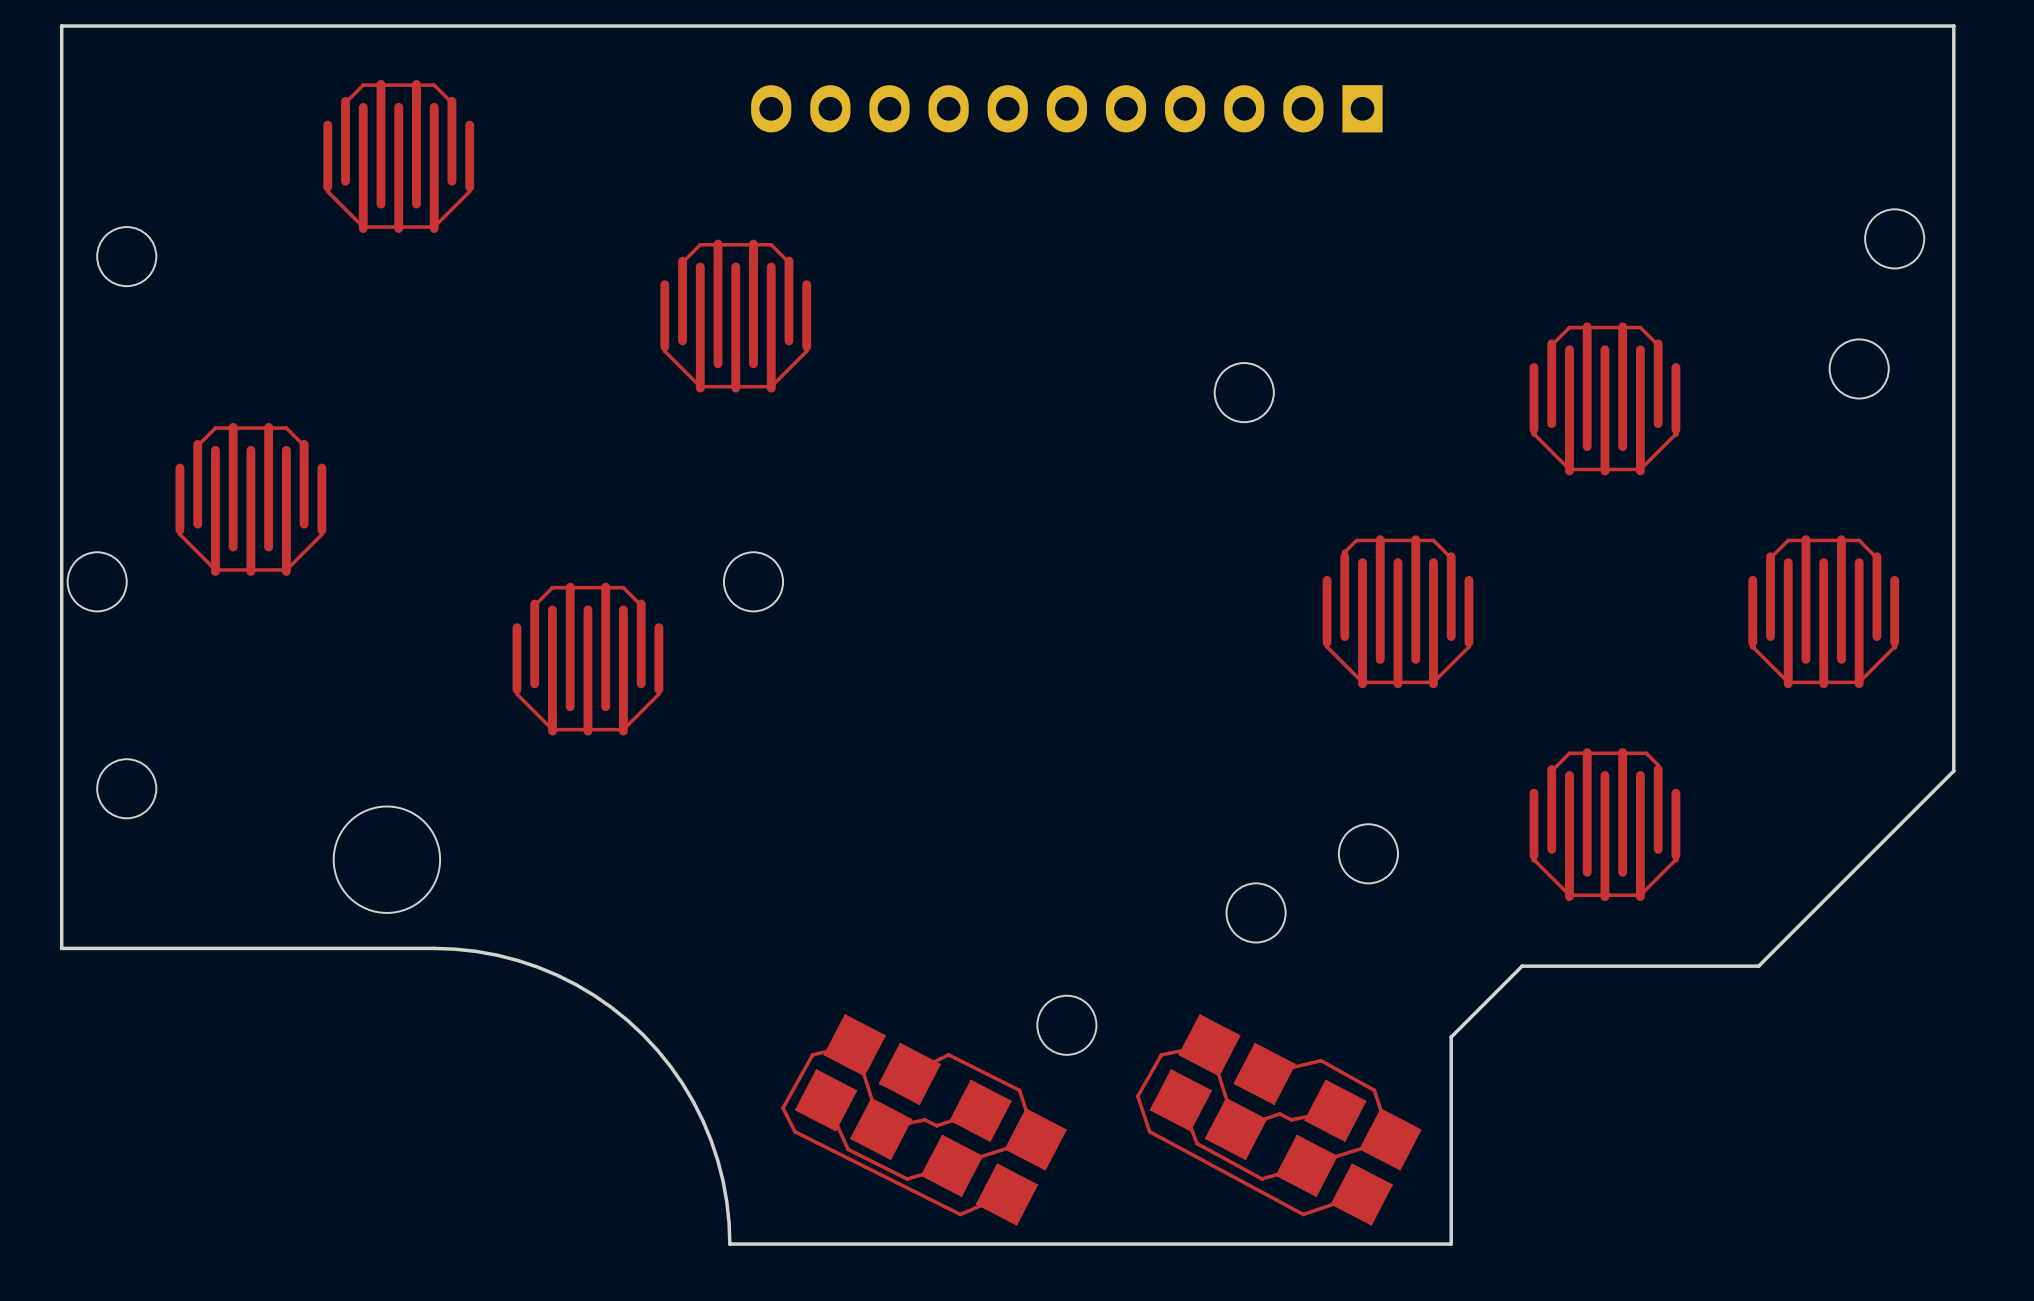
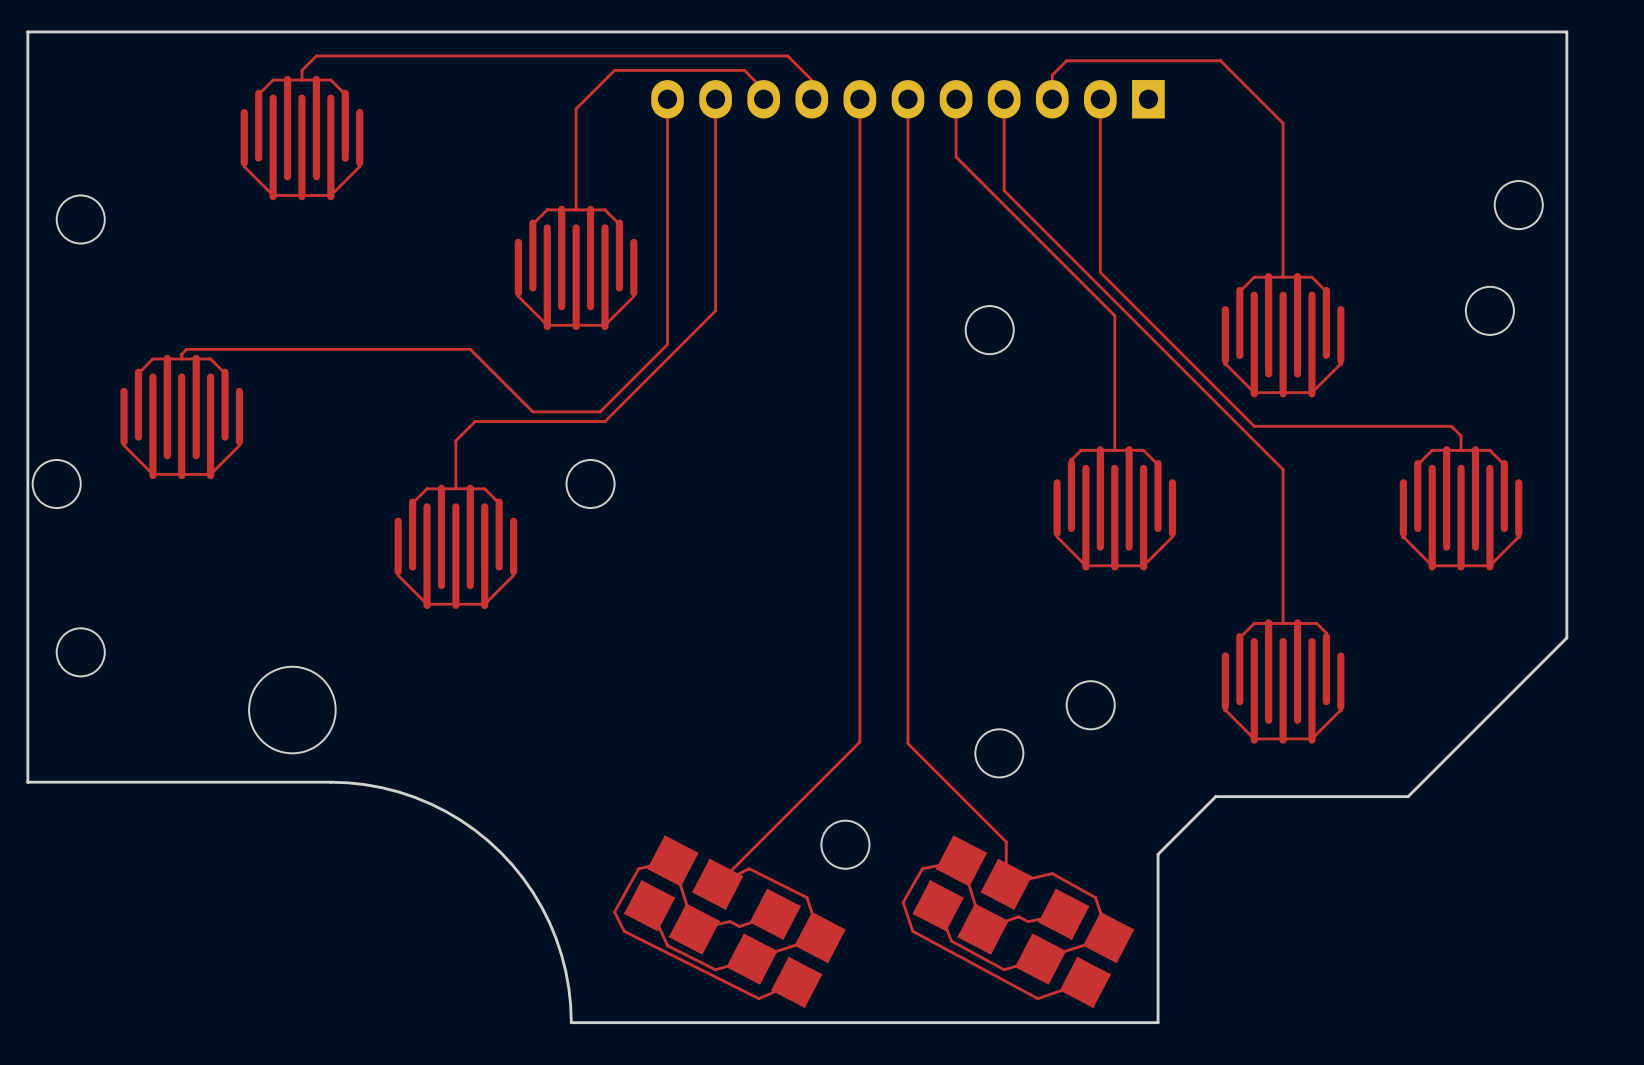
top track: none -> (301, 80) (301, 70) (316, 55) (787, 55) (811, 80) (811, 99)
top track: none -> (667, 99) (667, 344) (600, 411) (532, 411) (470, 349) (186, 349) (181, 354) (181, 358)
top track: none -> (715, 99) (715, 310) (604, 421) (475, 421) (455, 440) (455, 488)
top track: none -> (763, 99) (763, 89) (744, 70) (614, 70) (576, 108) (576, 209)
part position: (1066, 108) -> (907, 99)
top track: none -> (859, 99) (859, 742) (717, 884)
top track: none -> (907, 99) (907, 743) (1006, 842) (1006, 884)
top track: none -> (956, 99) (956, 156) (1114, 315) (1114, 450)
top track: none -> (1004, 99) (1004, 190) (1283, 469) (1283, 623)
top track: none -> (1052, 99) (1052, 75) (1066, 60) (1220, 60) (1283, 123) (1283, 277)
top track: none -> (1100, 99) (1100, 272) (1254, 426) (1451, 426) (1461, 435) (1461, 450)

